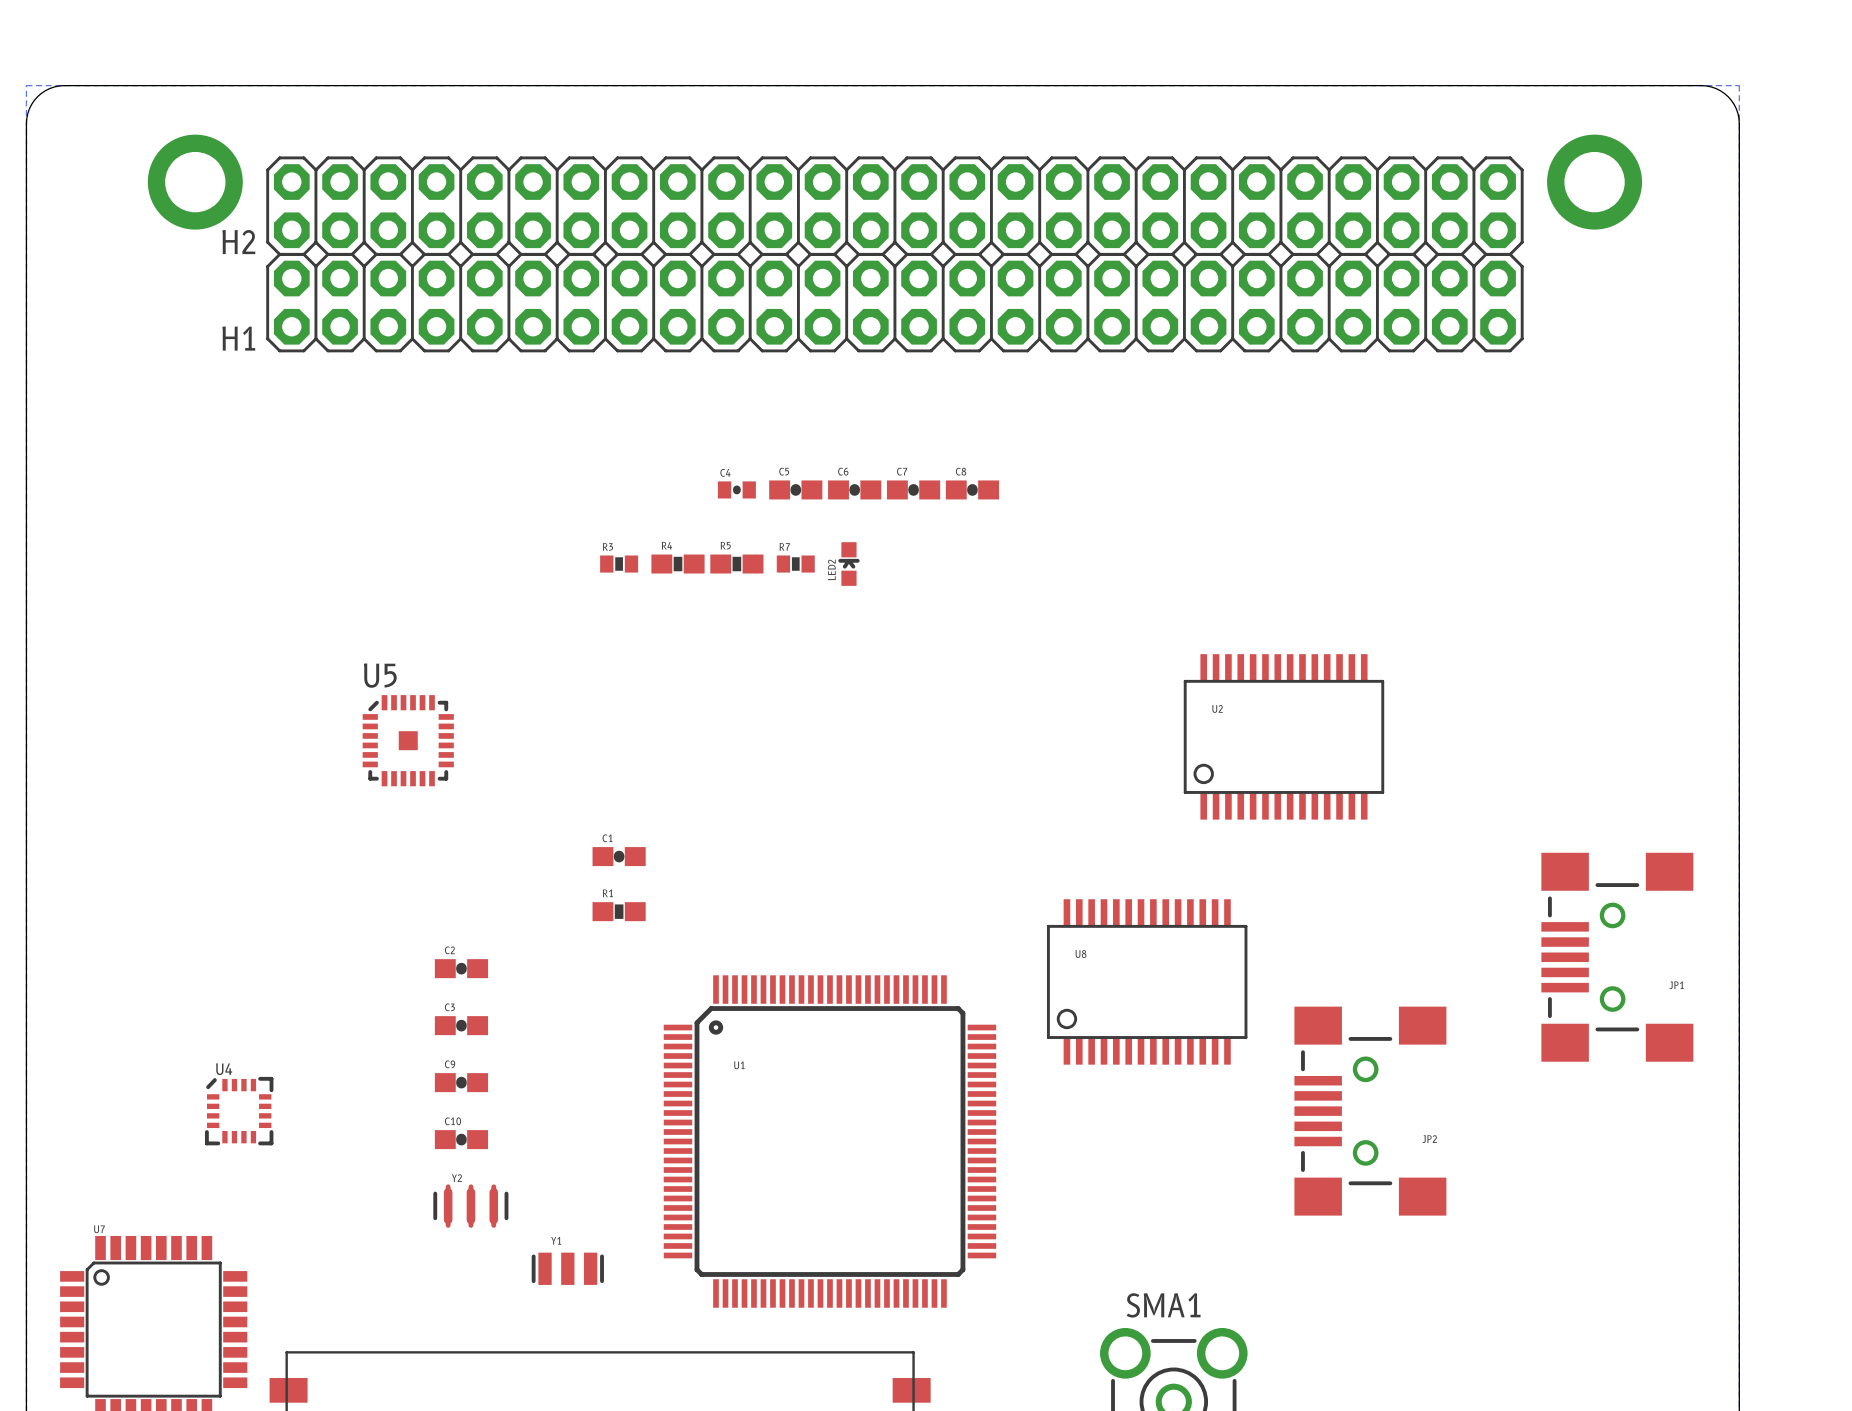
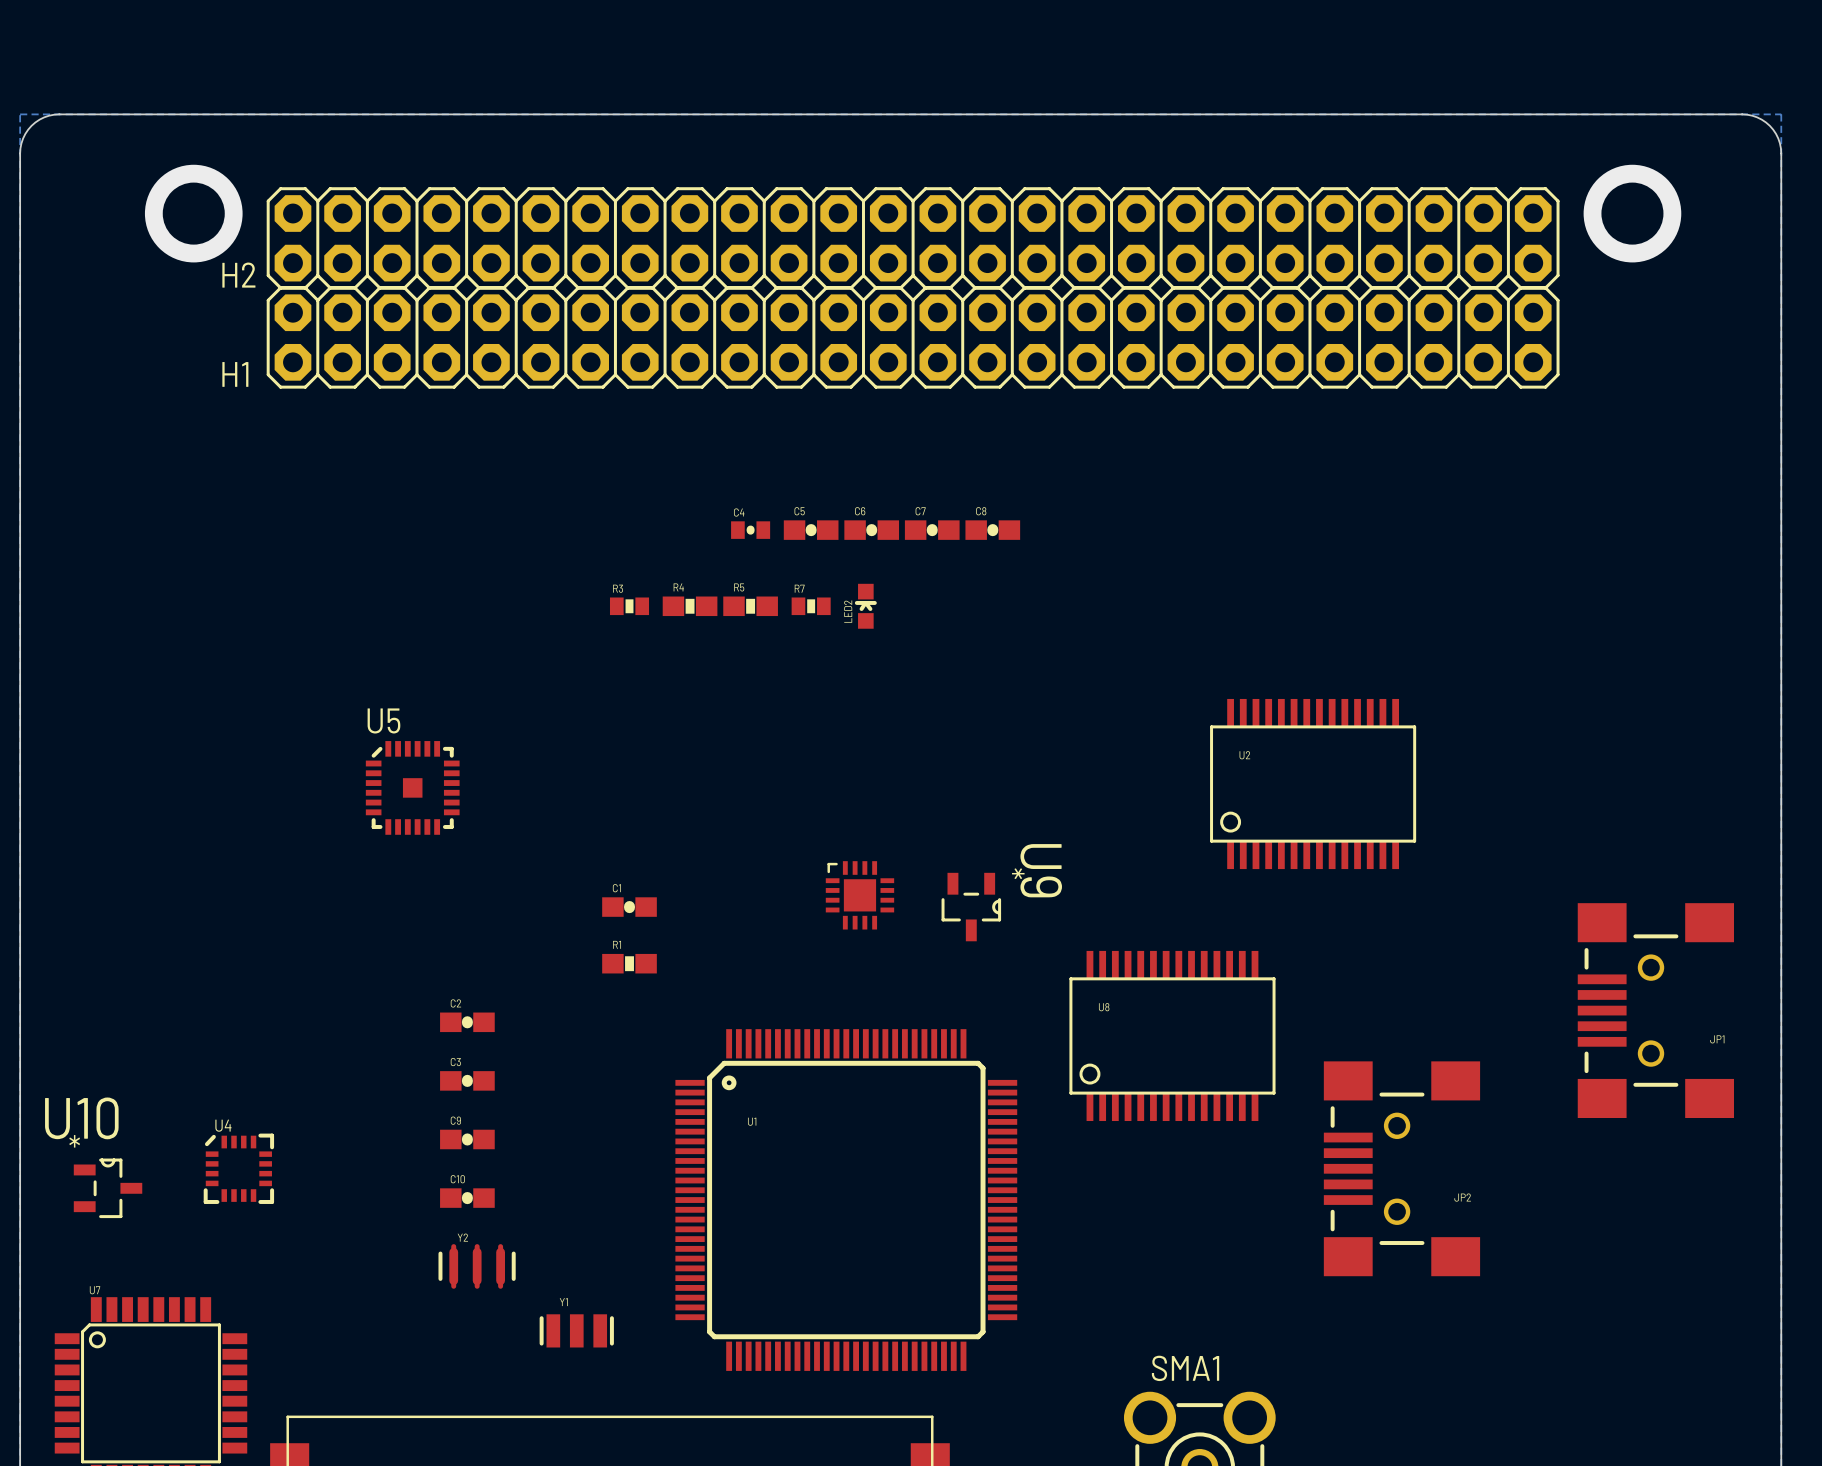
part: none -> (859, 895)
U9: none -> (971, 907)
U10: none -> (108, 1188)

